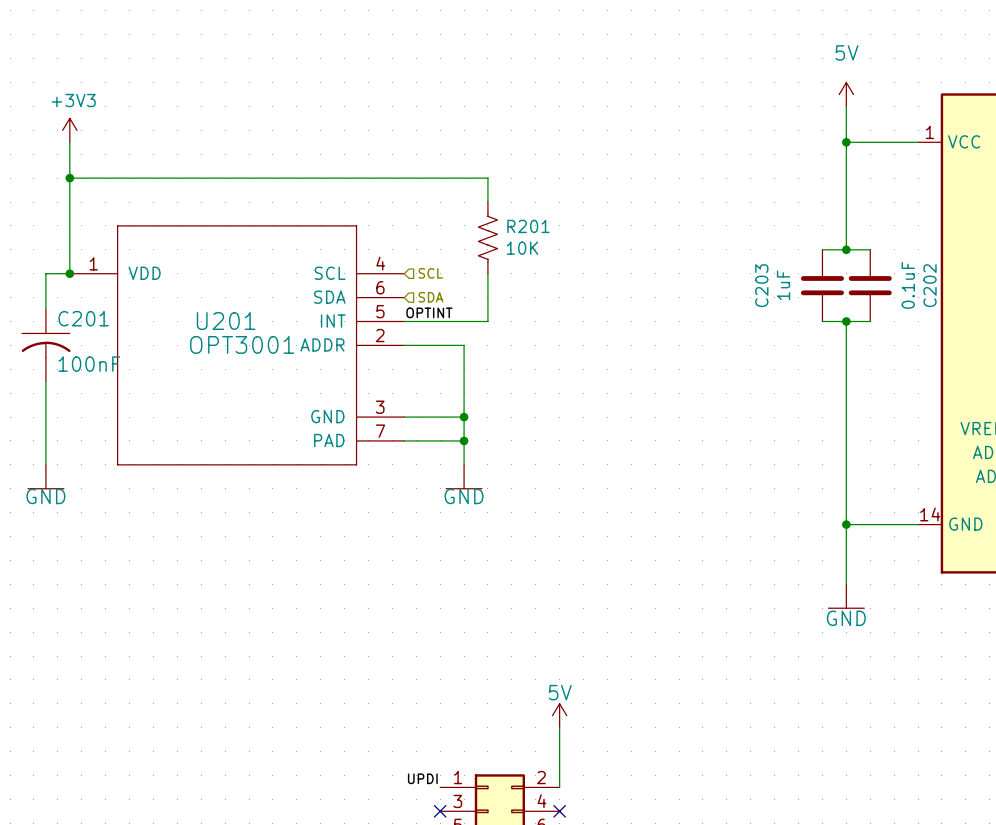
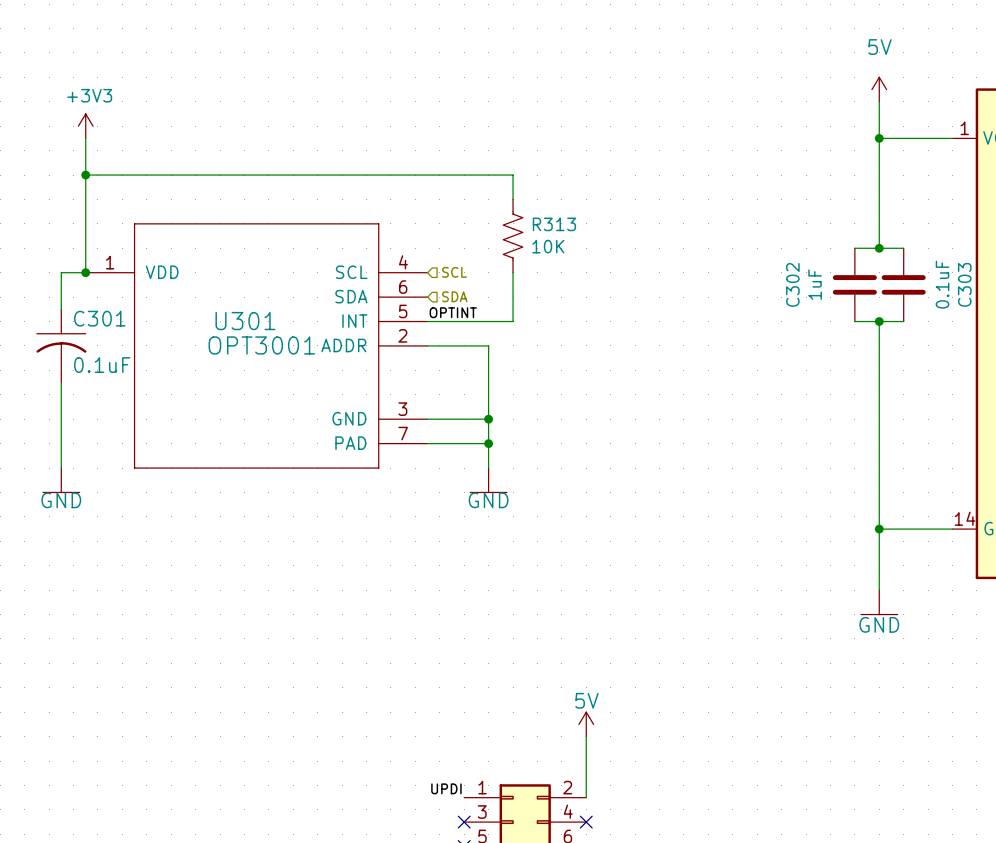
R201 name: R201 (528, 226) -> R313 (554, 224)
C203 name: C203 (761, 285) -> C302 (792, 284)
C202 name: C202 (930, 285) -> C303 (964, 284)
C201 name: C201 (83, 318) -> C301 (99, 318)
U201 name: U201 (226, 321) -> U301 (245, 321)
C201 value: 100nF (89, 364) -> 0.1uF (102, 365)

